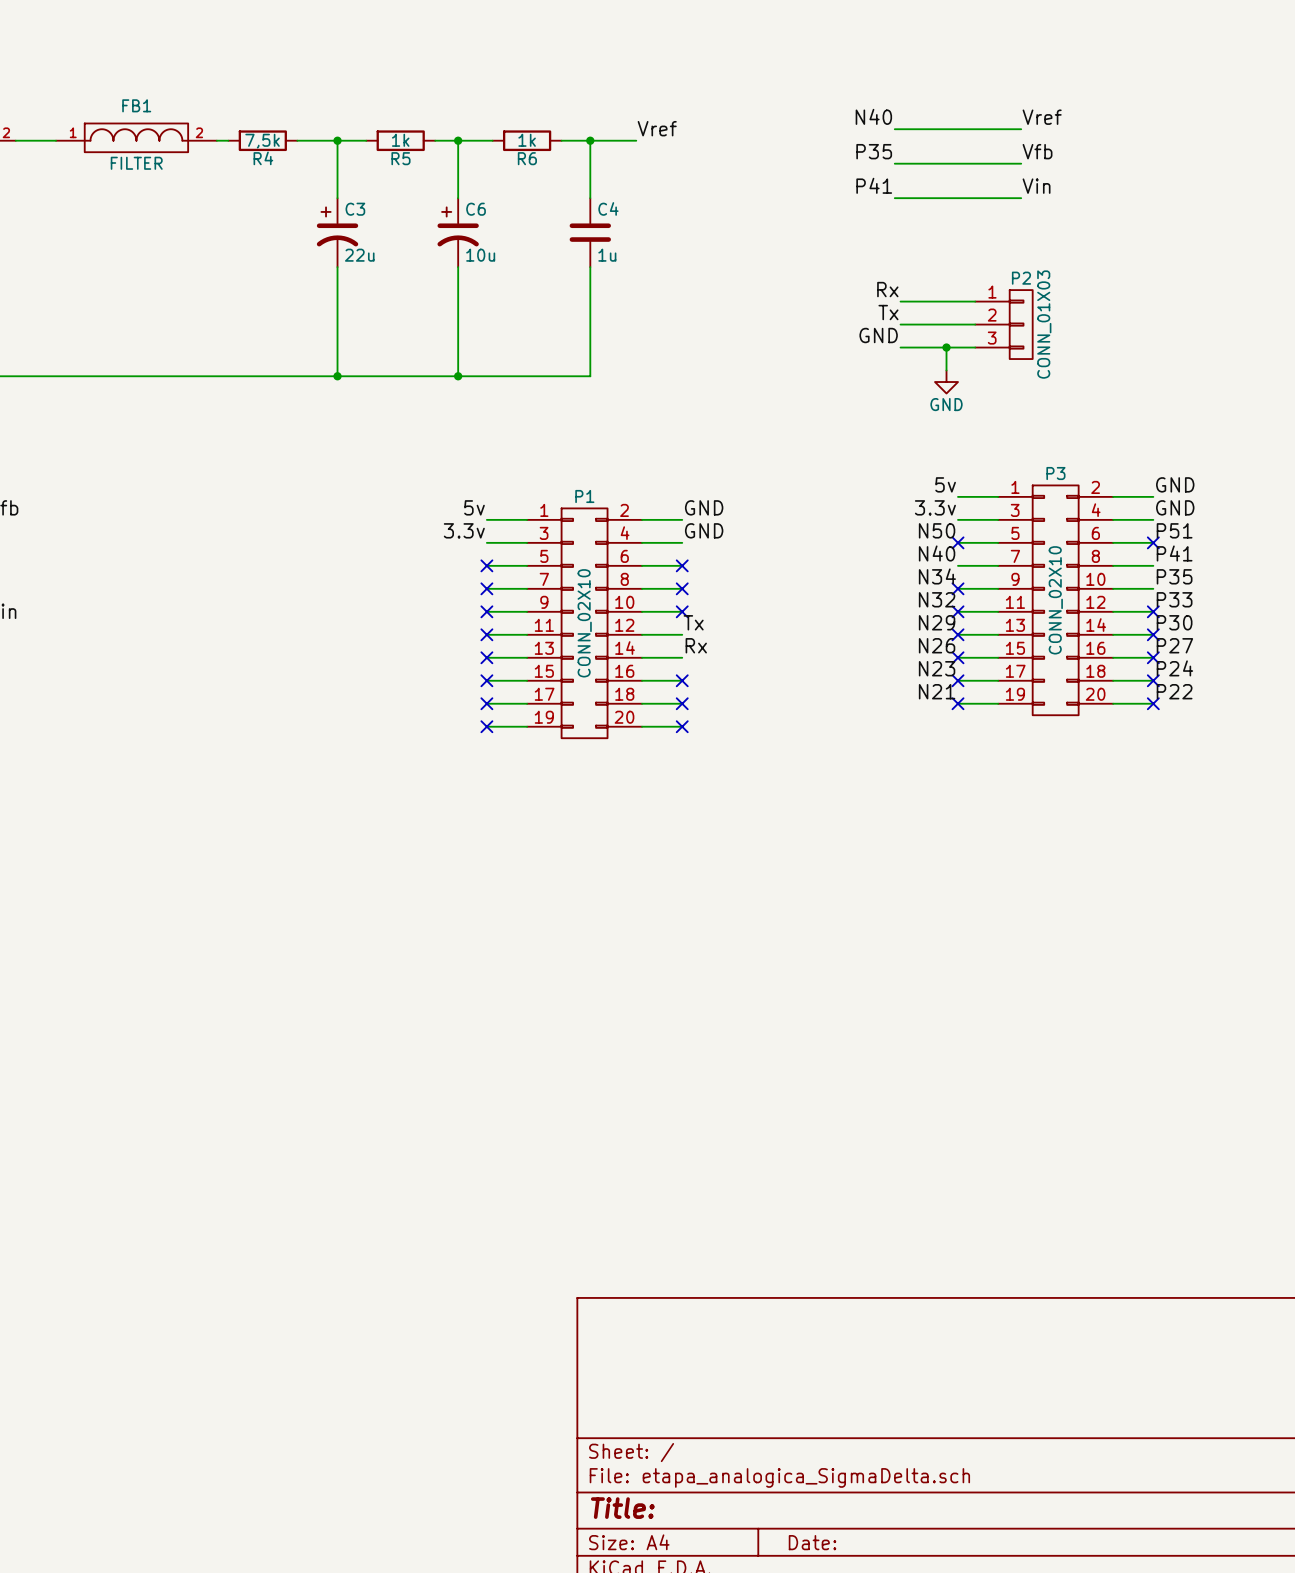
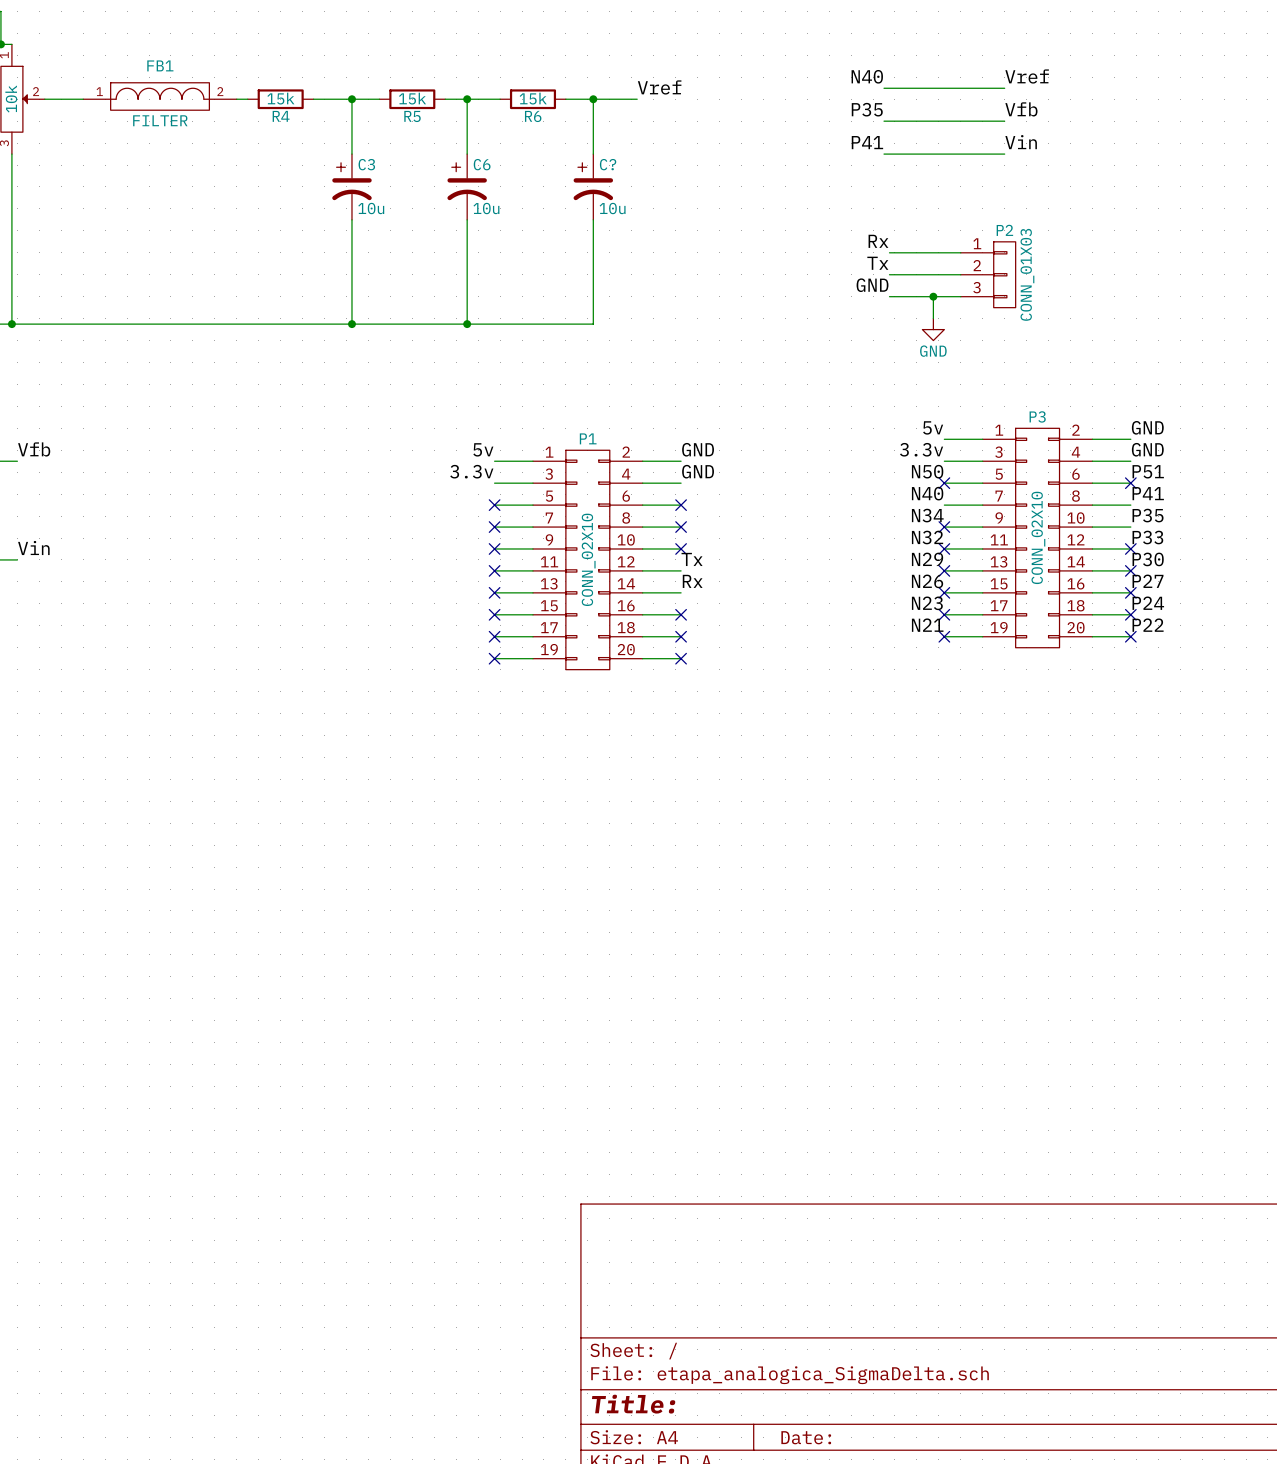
R5 value: 1k (400, 140) -> 15k (412, 98)
R6 value: 1k (527, 140) -> 15k (533, 98)
R4 value: 7,5k (262, 141) -> 15k (280, 98)
C4: 1u (590, 232) -> none
C?: none -> 10u (593, 186)
C3 value: 22u (359, 255) -> 10u (371, 208)

